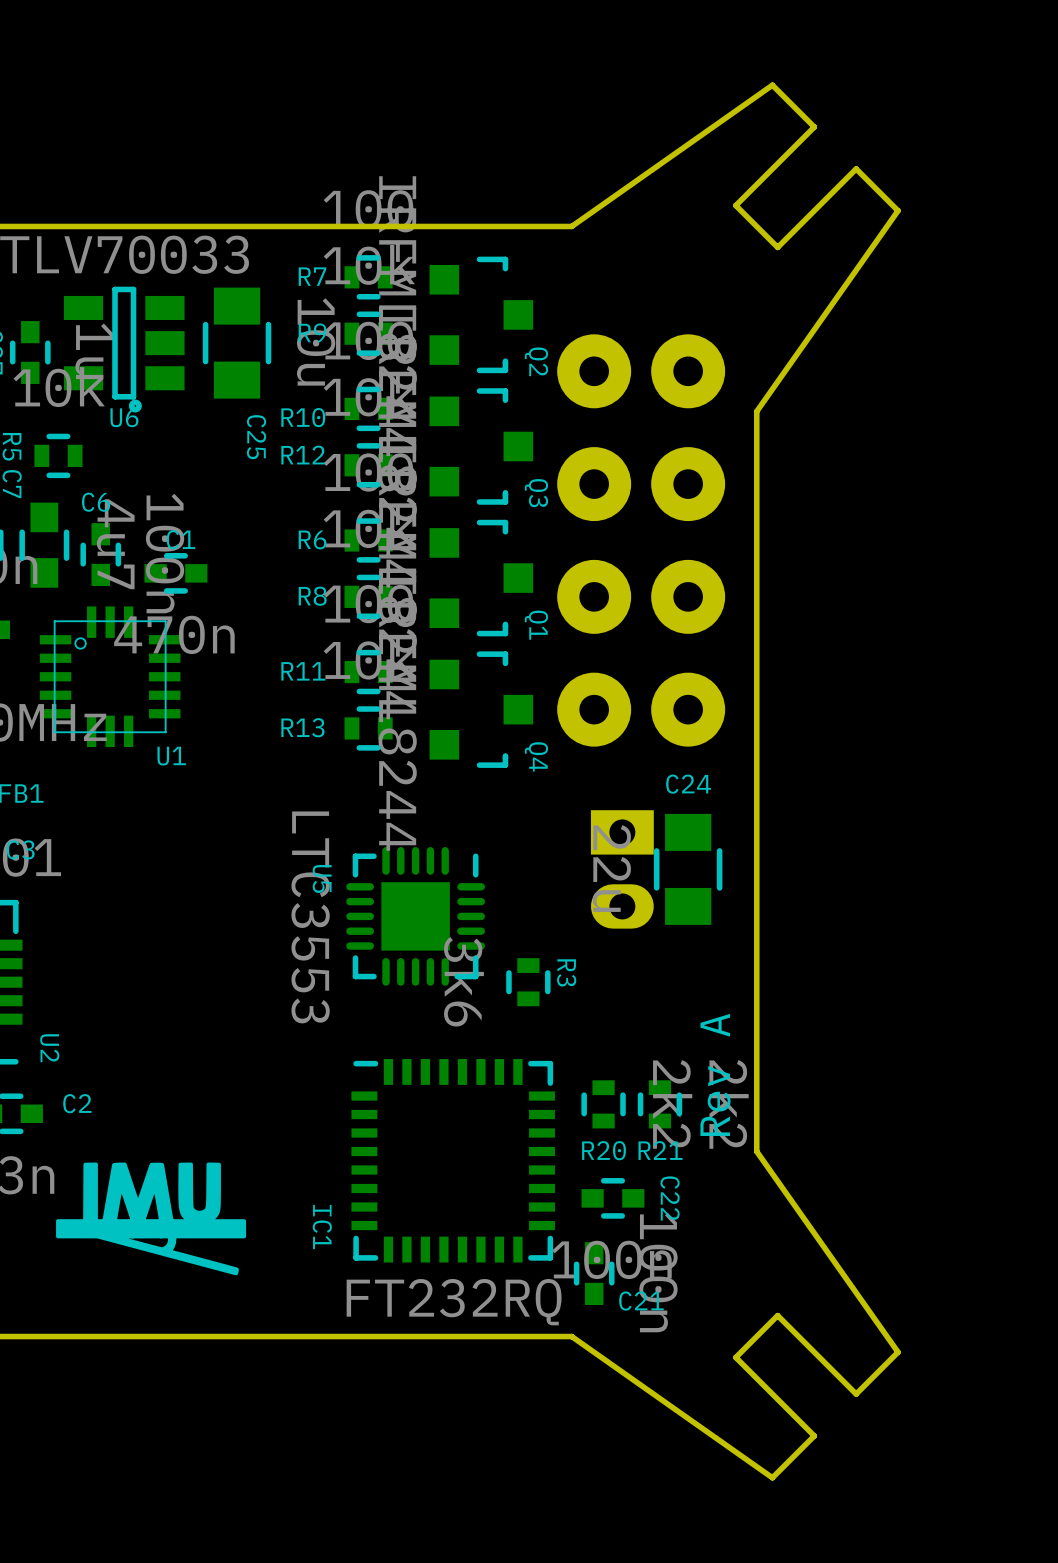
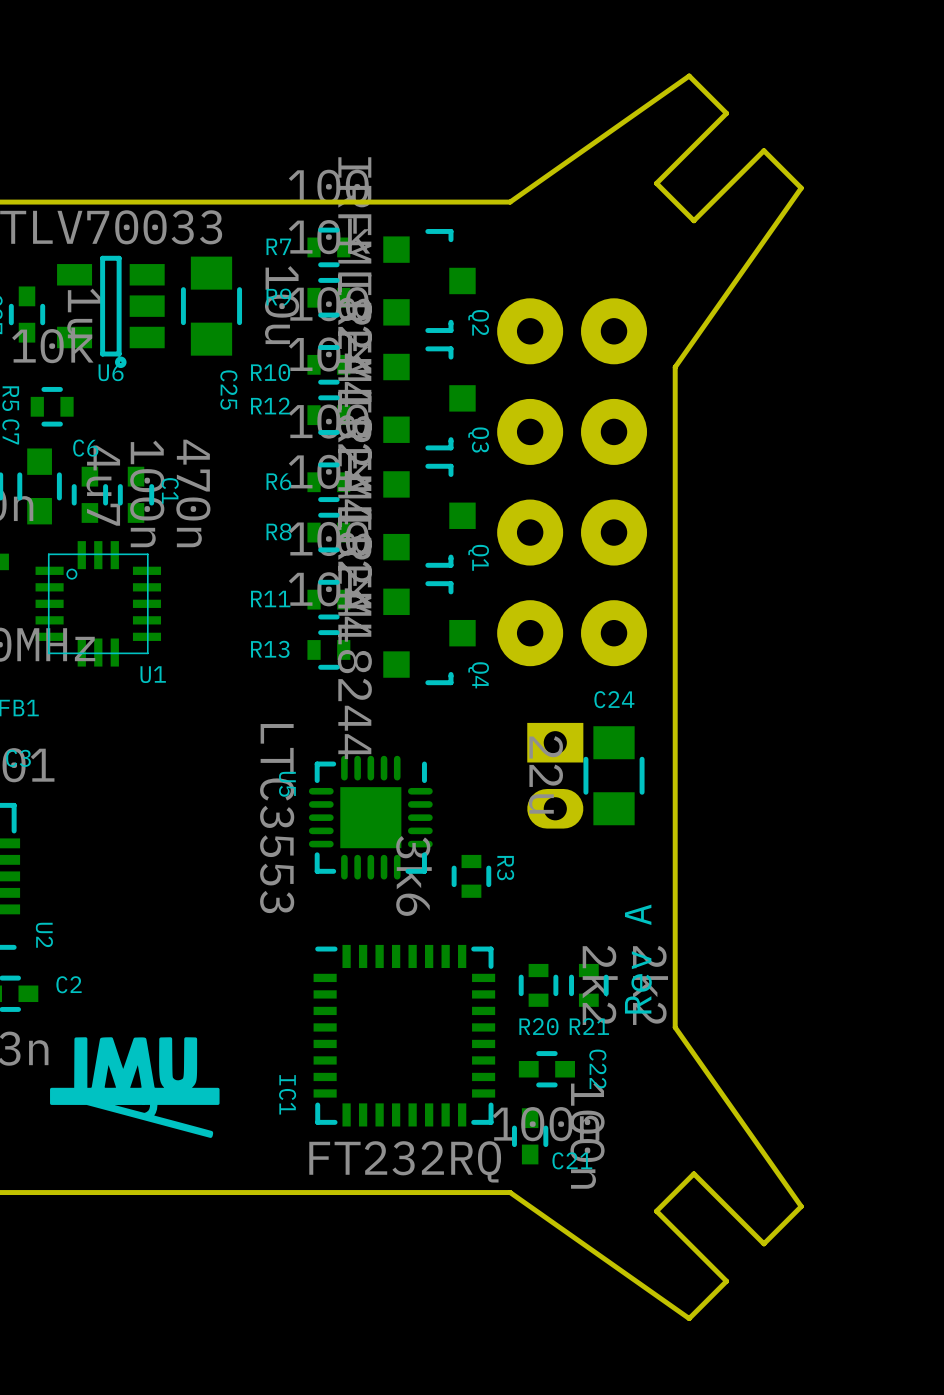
C1 rotation: 0° (175, 573) -> 90° clockwise (136, 494)
C1 value position: 470n (174, 634) -> 470n (193, 493)

